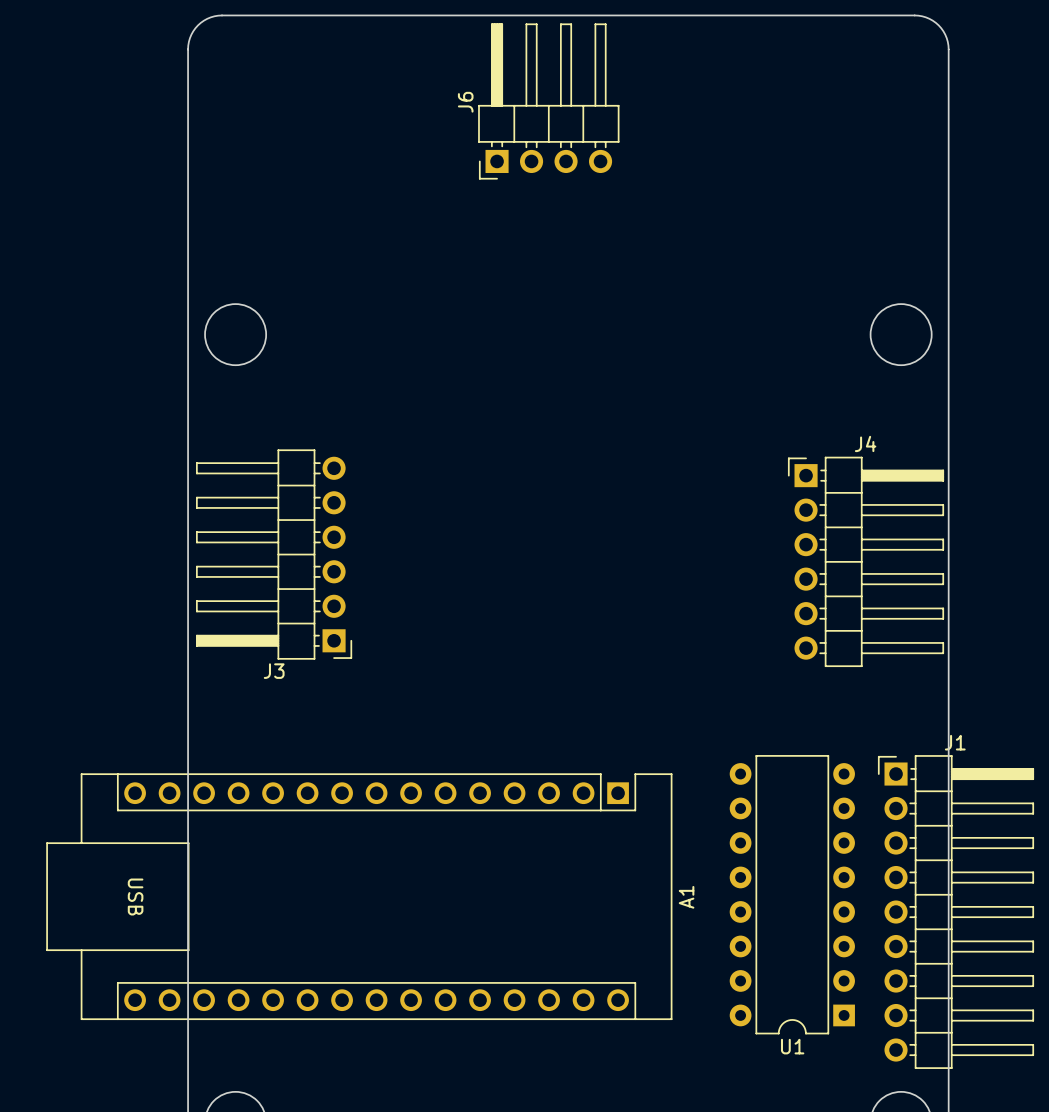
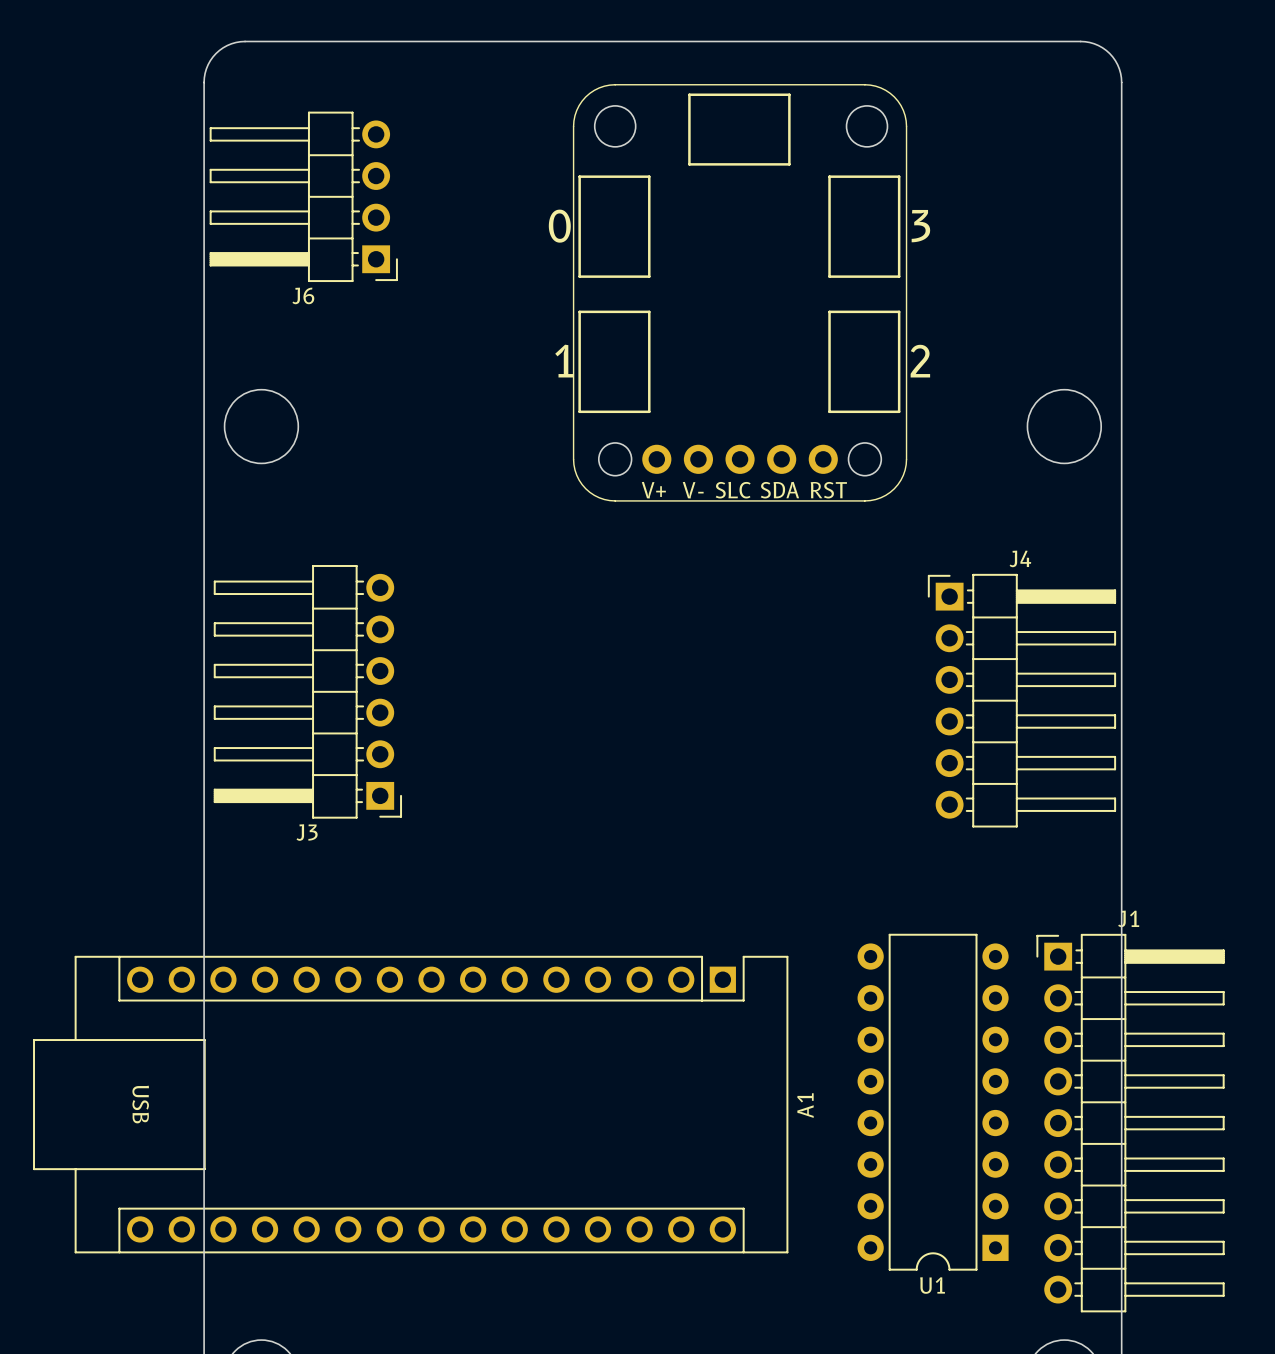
J6 rotation: 0° (548, 101) -> 90° counterclockwise (303, 196)
J6 position: (548, 101) -> (303, 196)
part: none -> (740, 292)

